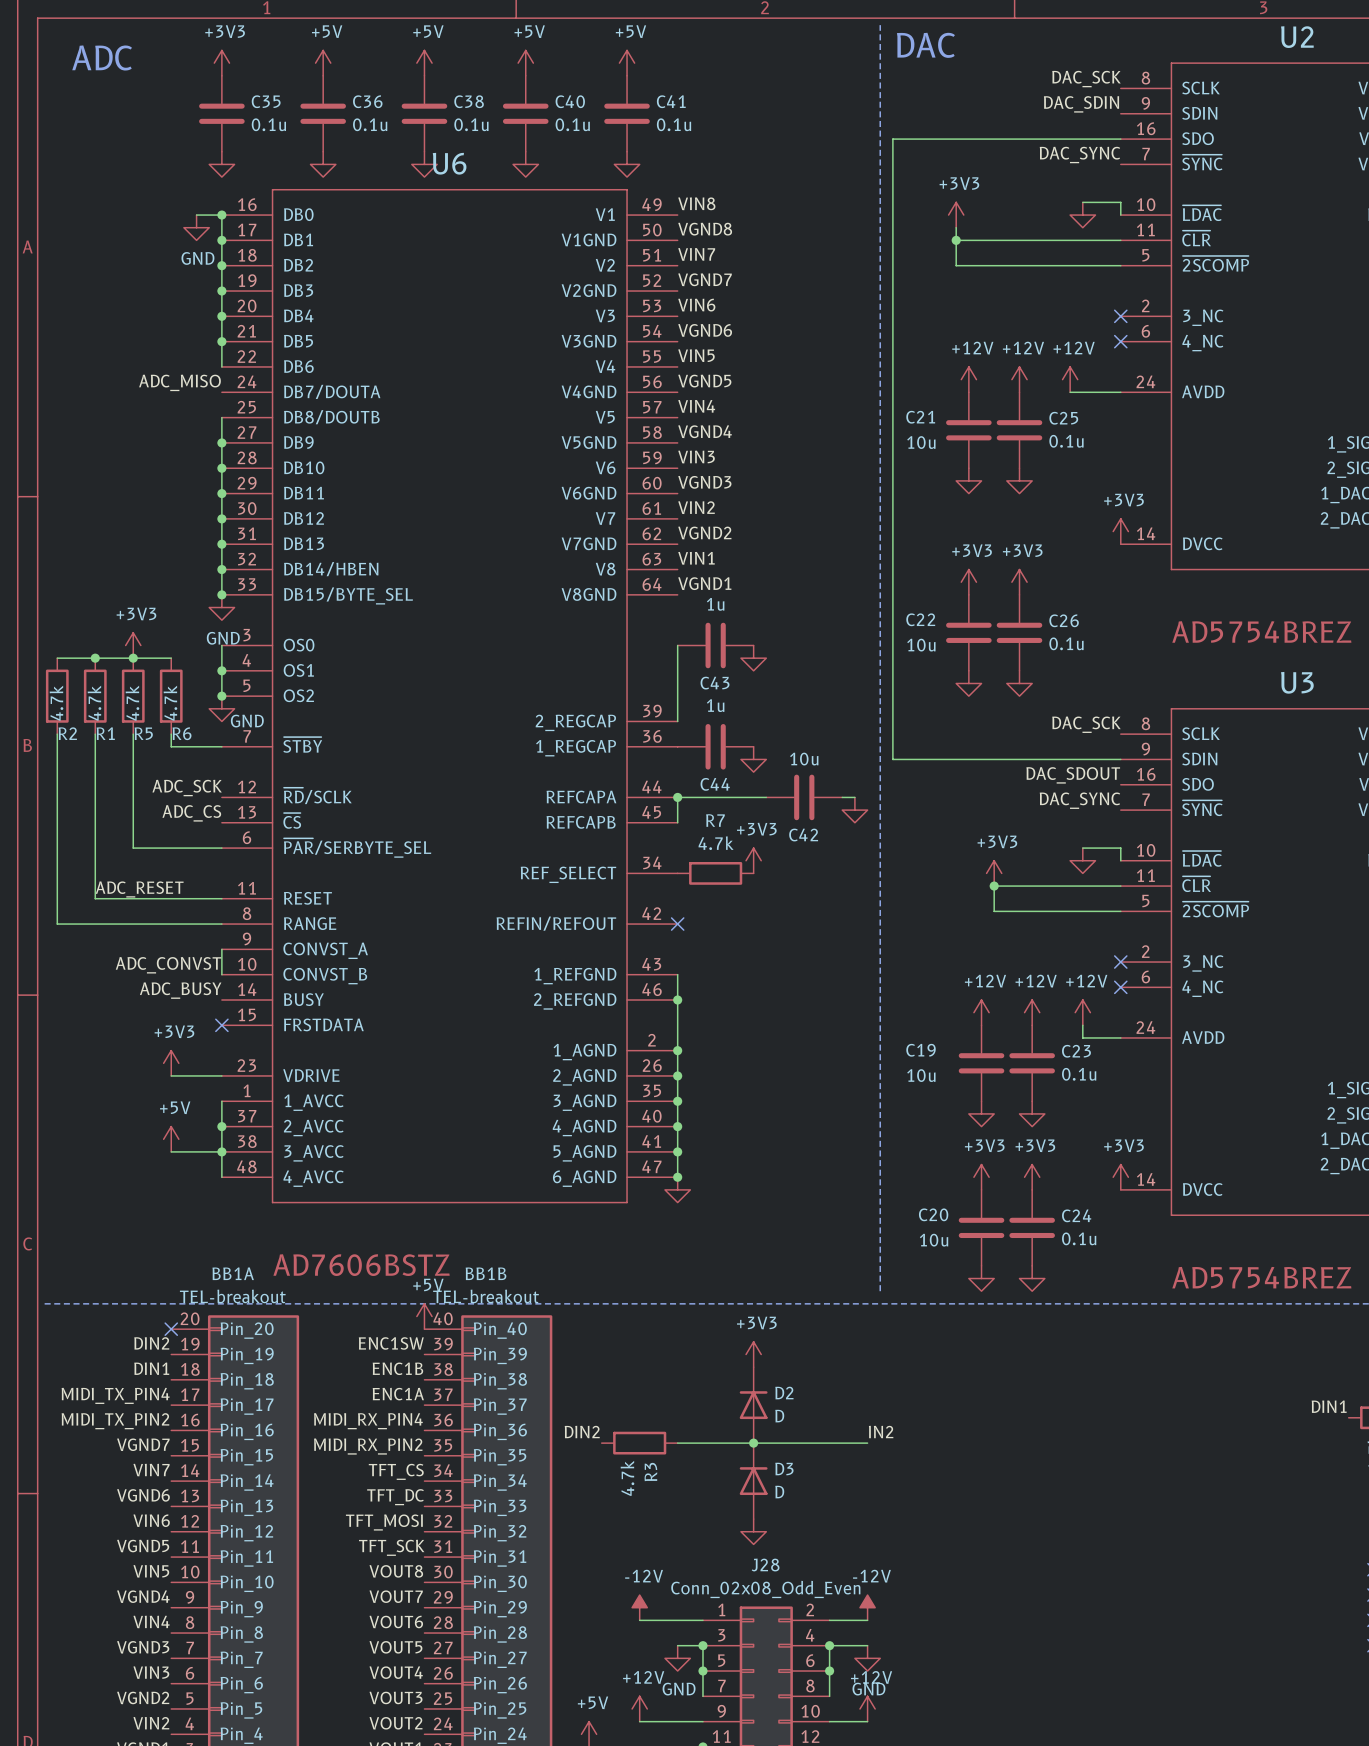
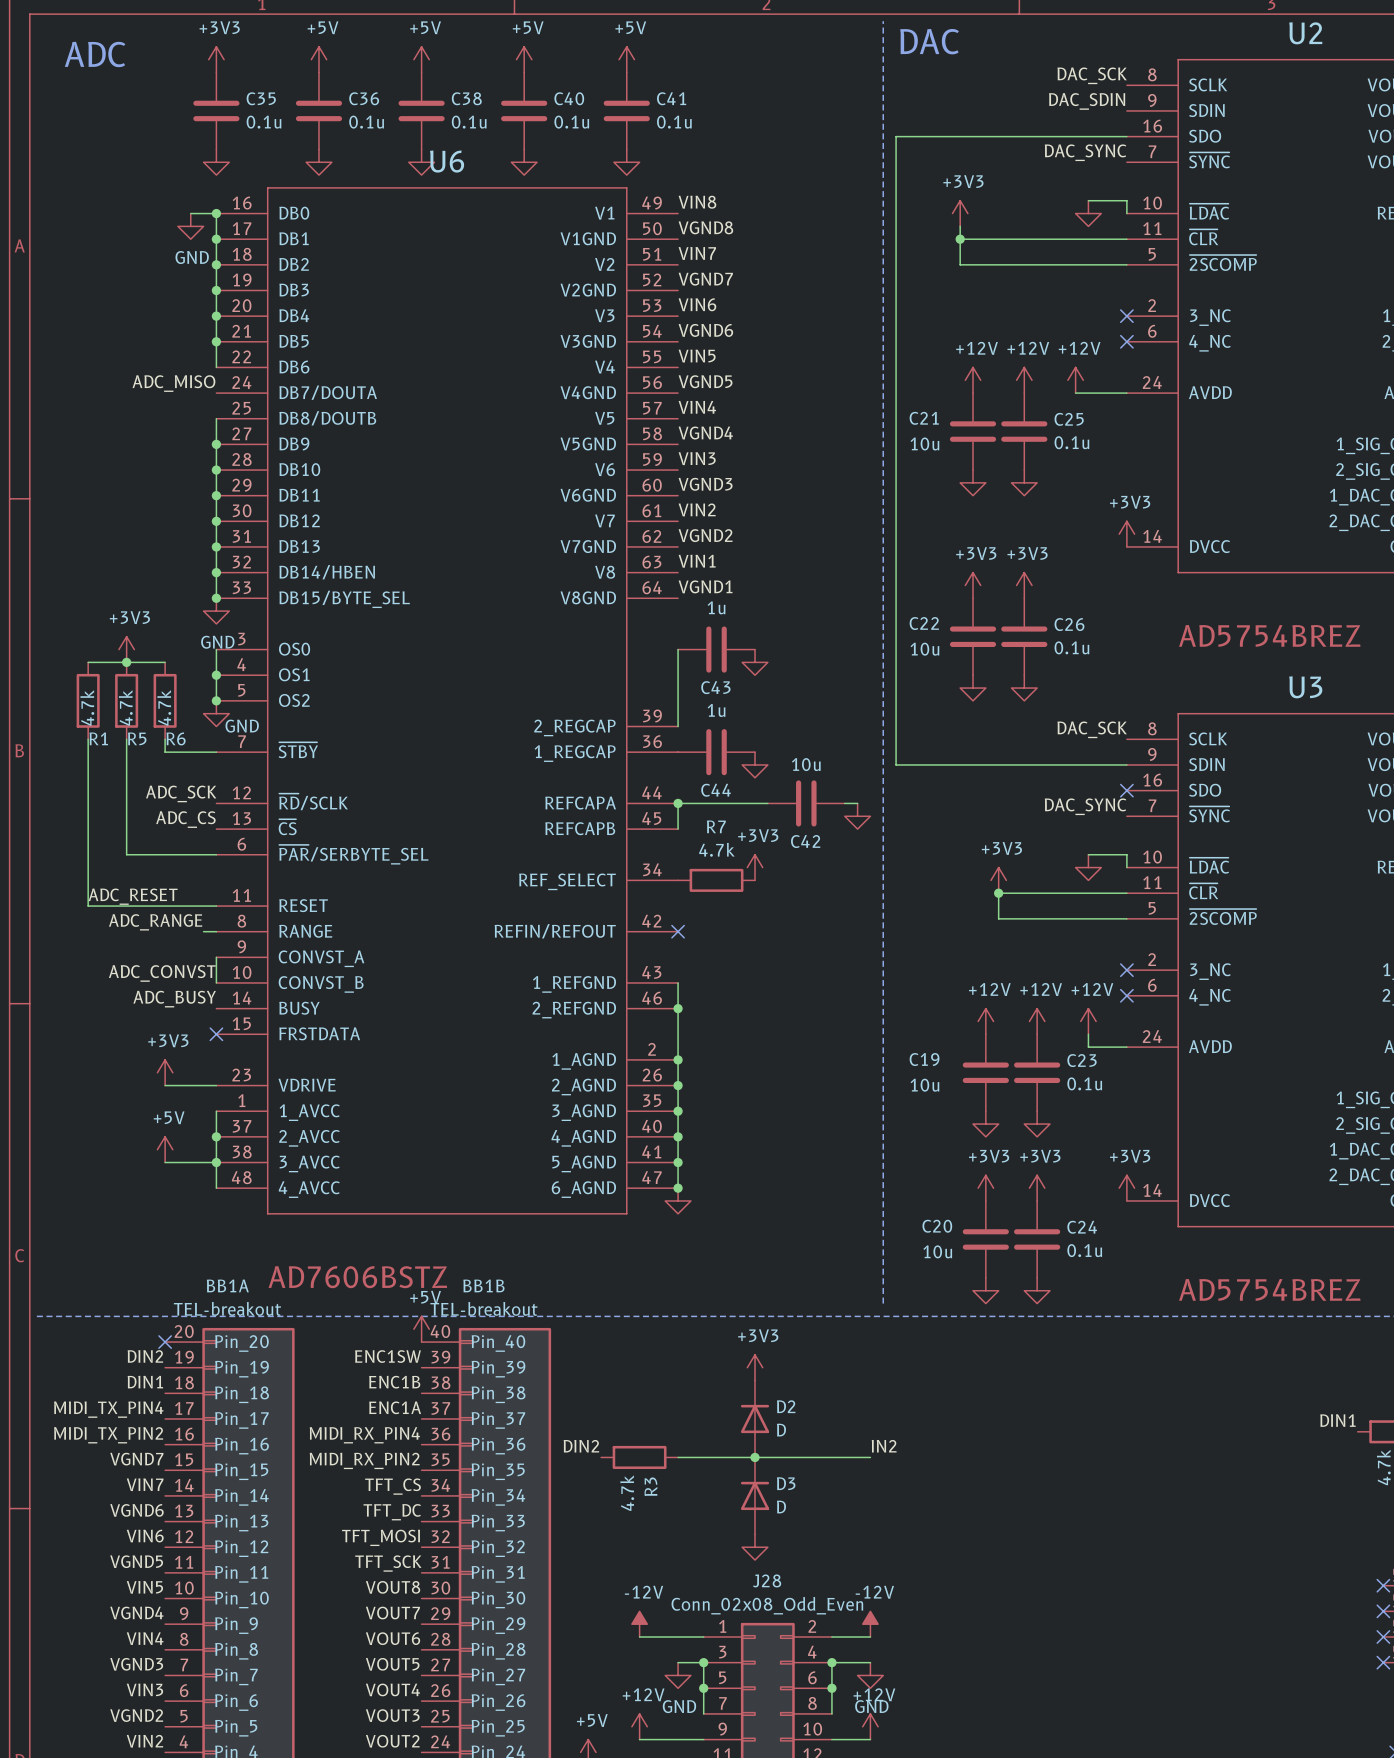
wire: (57, 658) (95, 658) -> none
junction: (95, 658) -> none
R2: 4.7k (57, 696) -> none
wire: (57, 734) (57, 924) (209, 924) -> none
label: DAC_SDOUT (1073, 775) -> none
no-connect mark: none -> (1126, 790)
label: none -> ADC_RANGE (155, 922)

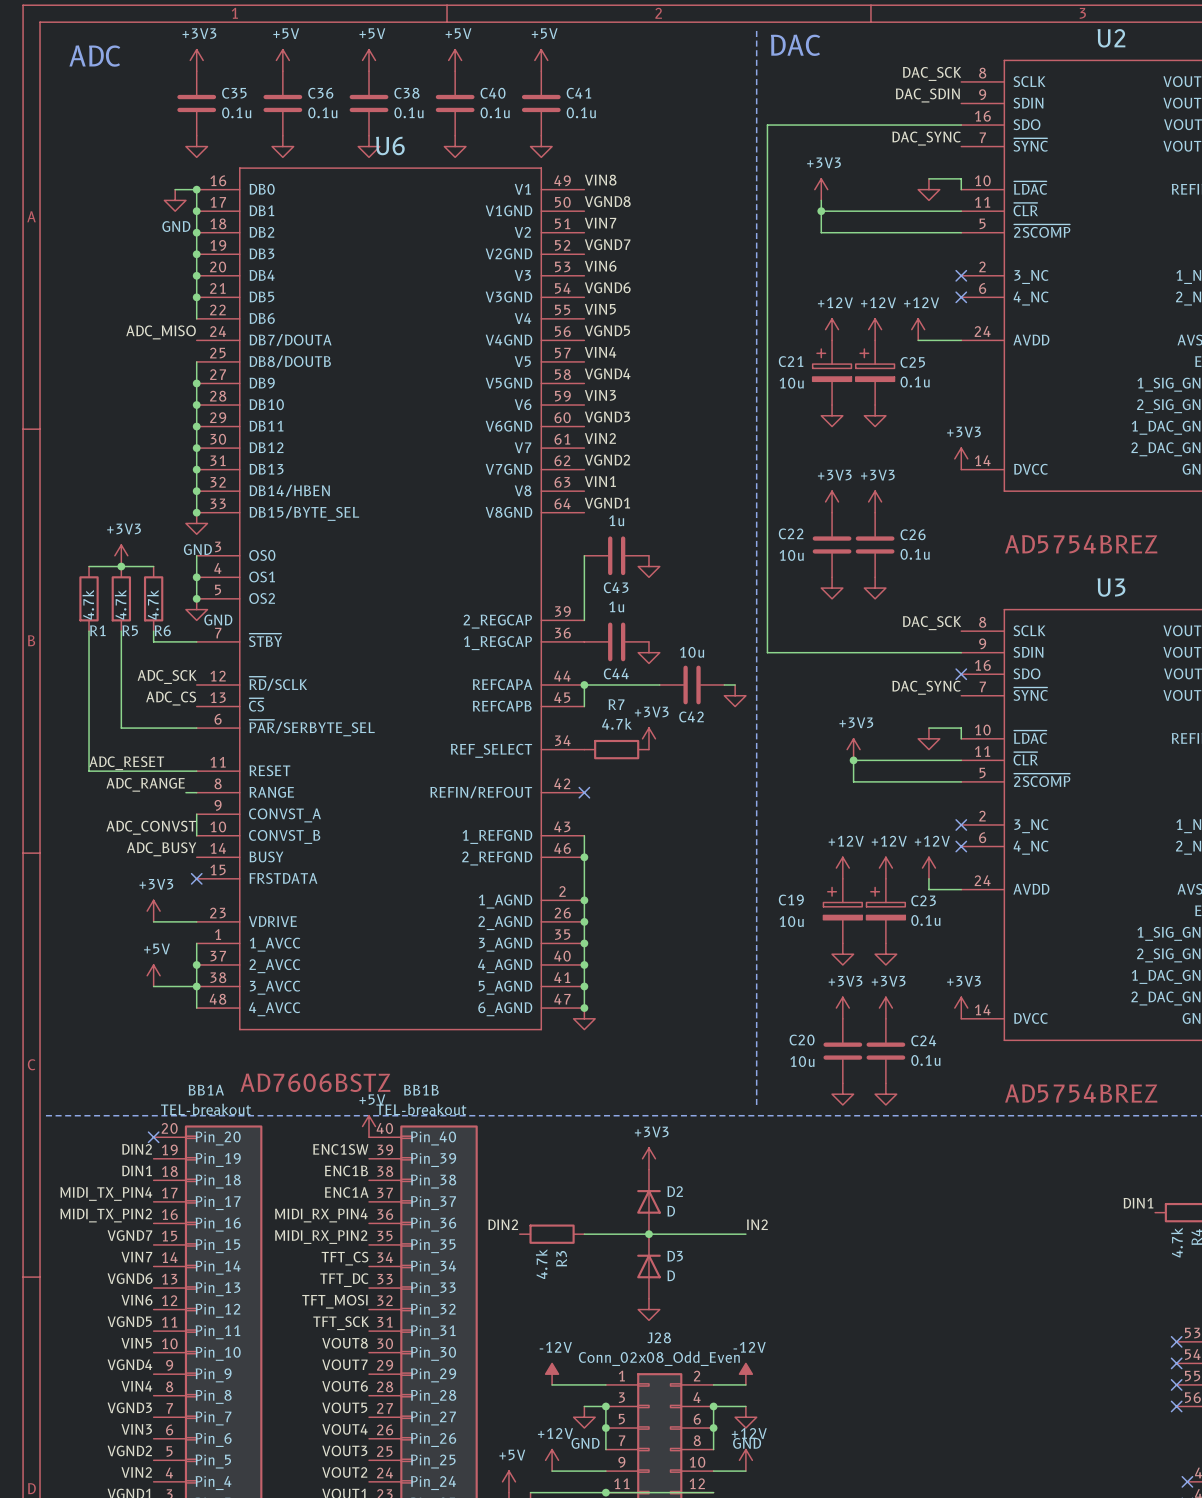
C21 symbol: [949, 393, 997, 471] -> [812, 340, 852, 406]
C25 symbol: [1001, 393, 1048, 471] -> [855, 340, 895, 406]
C19 symbol: [962, 1034, 1009, 1112] -> [823, 878, 863, 944]
C23 symbol: [1014, 1034, 1061, 1112] -> [866, 878, 906, 944]

